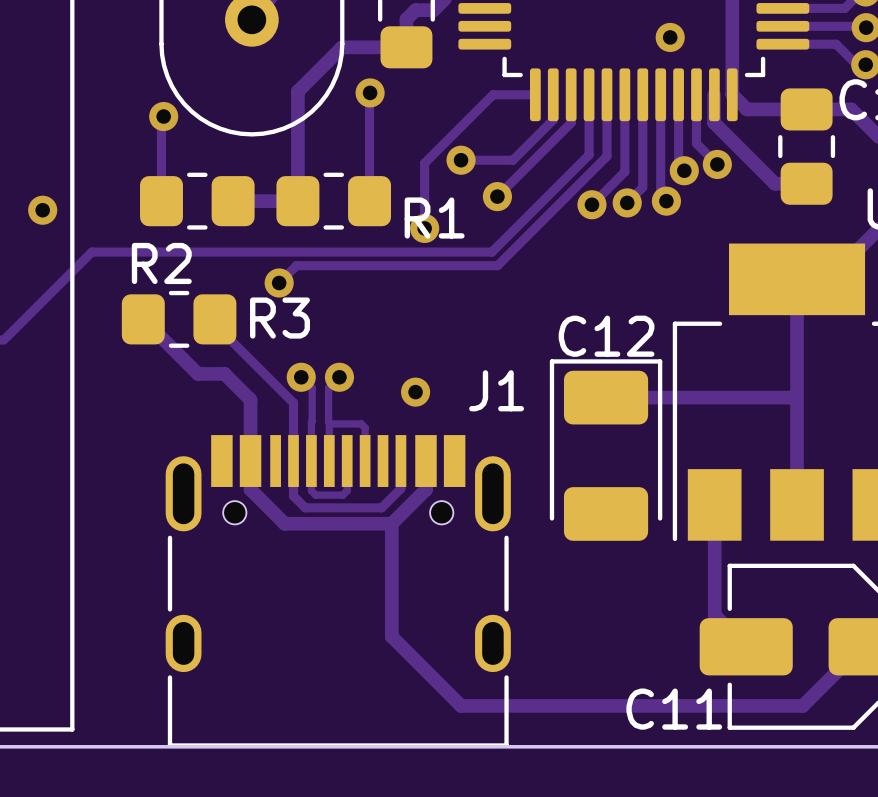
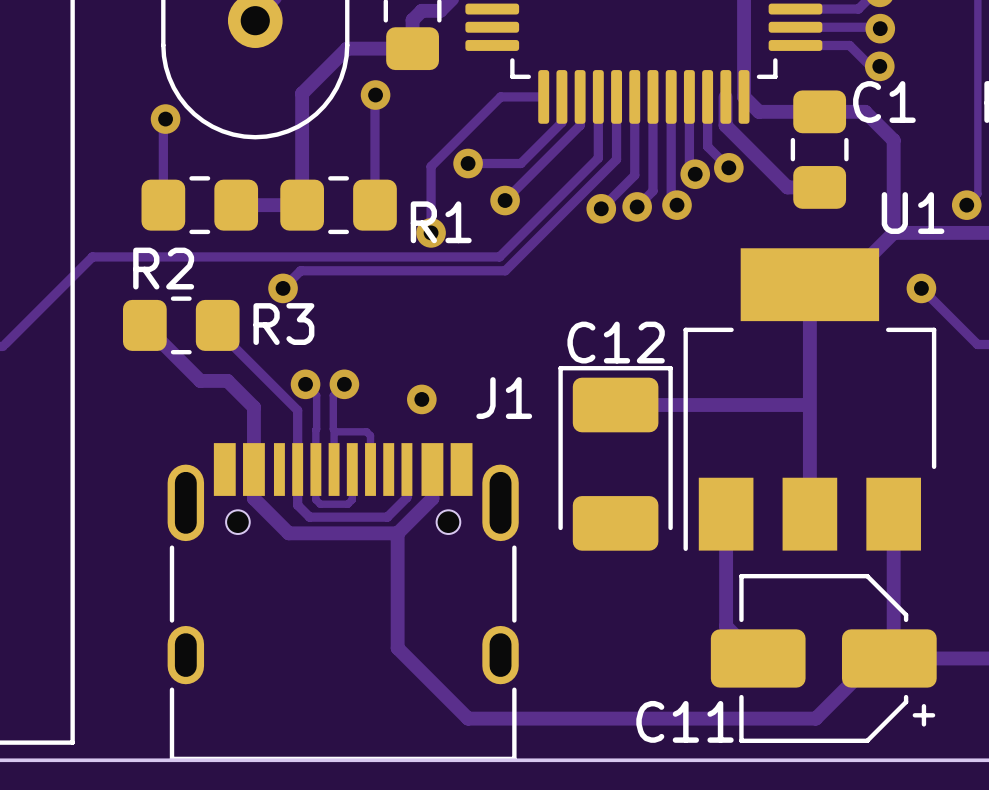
via: (670, 37) -> none
via: (42, 210) -> none

